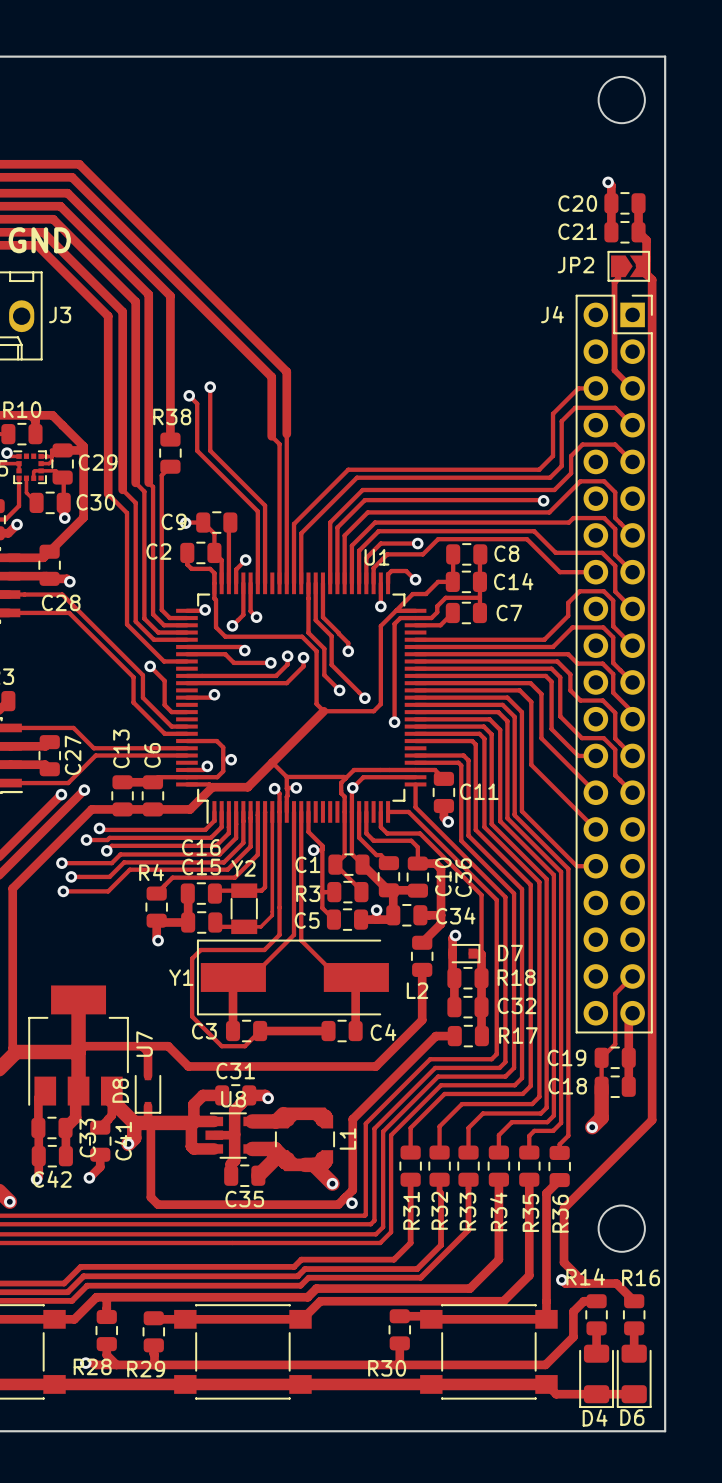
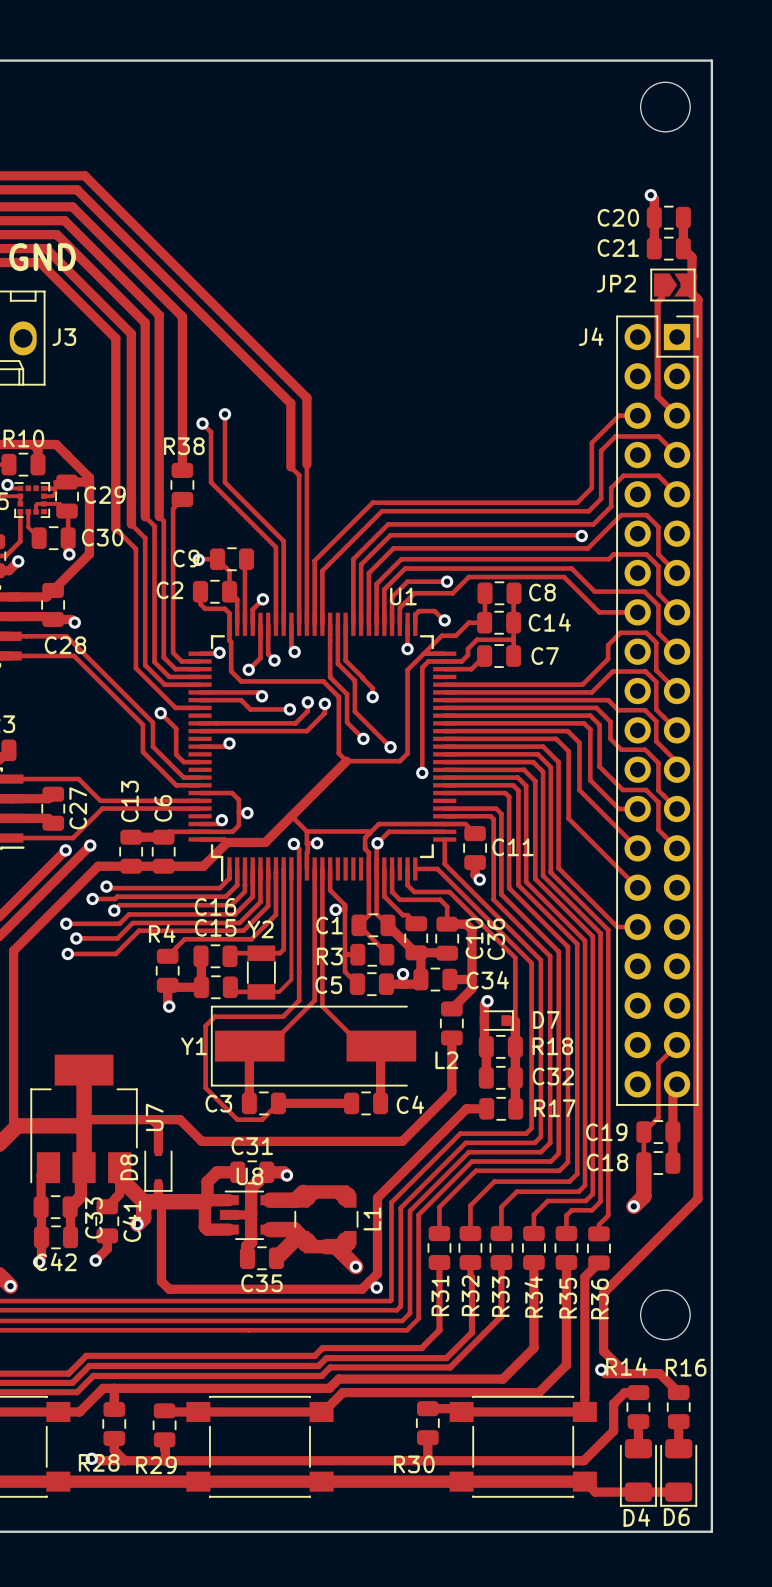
track: none -> (291, 624) (291, 648) (294, 652)
via: none -> (294, 652)

